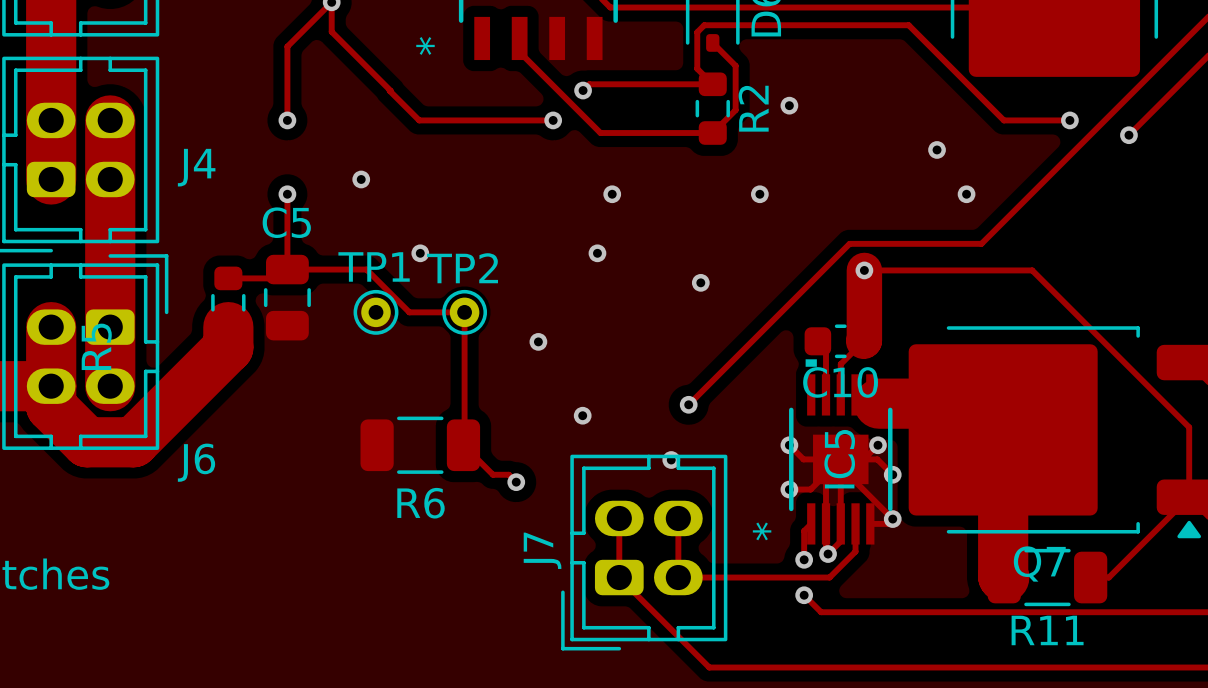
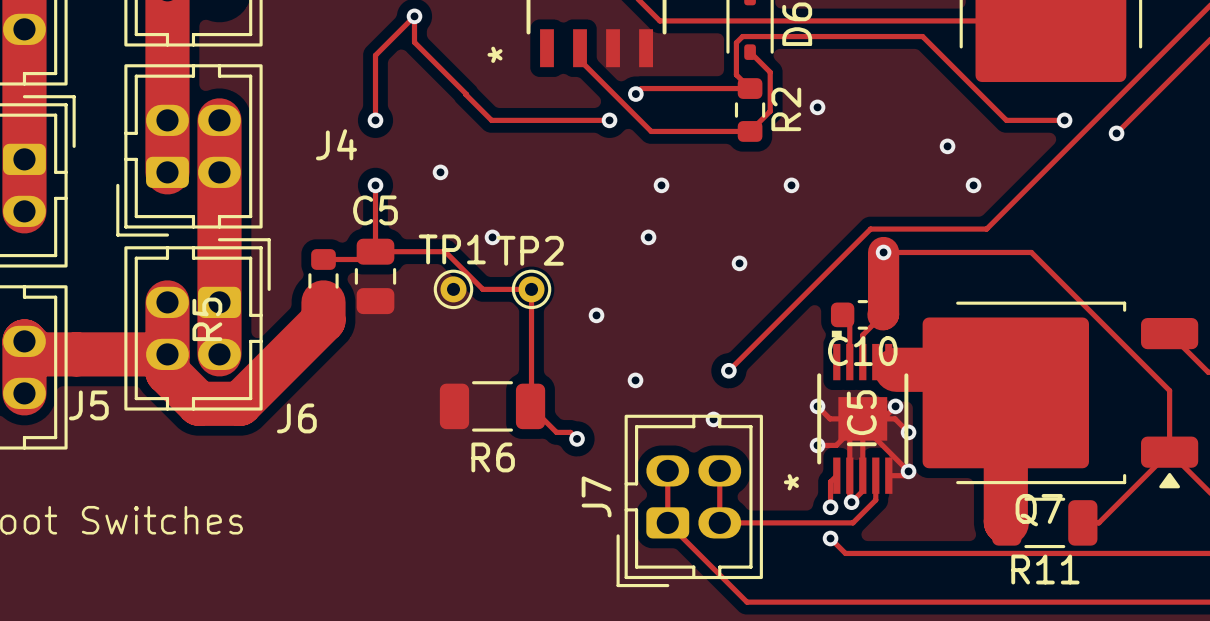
J4 name position: J4 (196, 167) -> J4 (336, 144)

